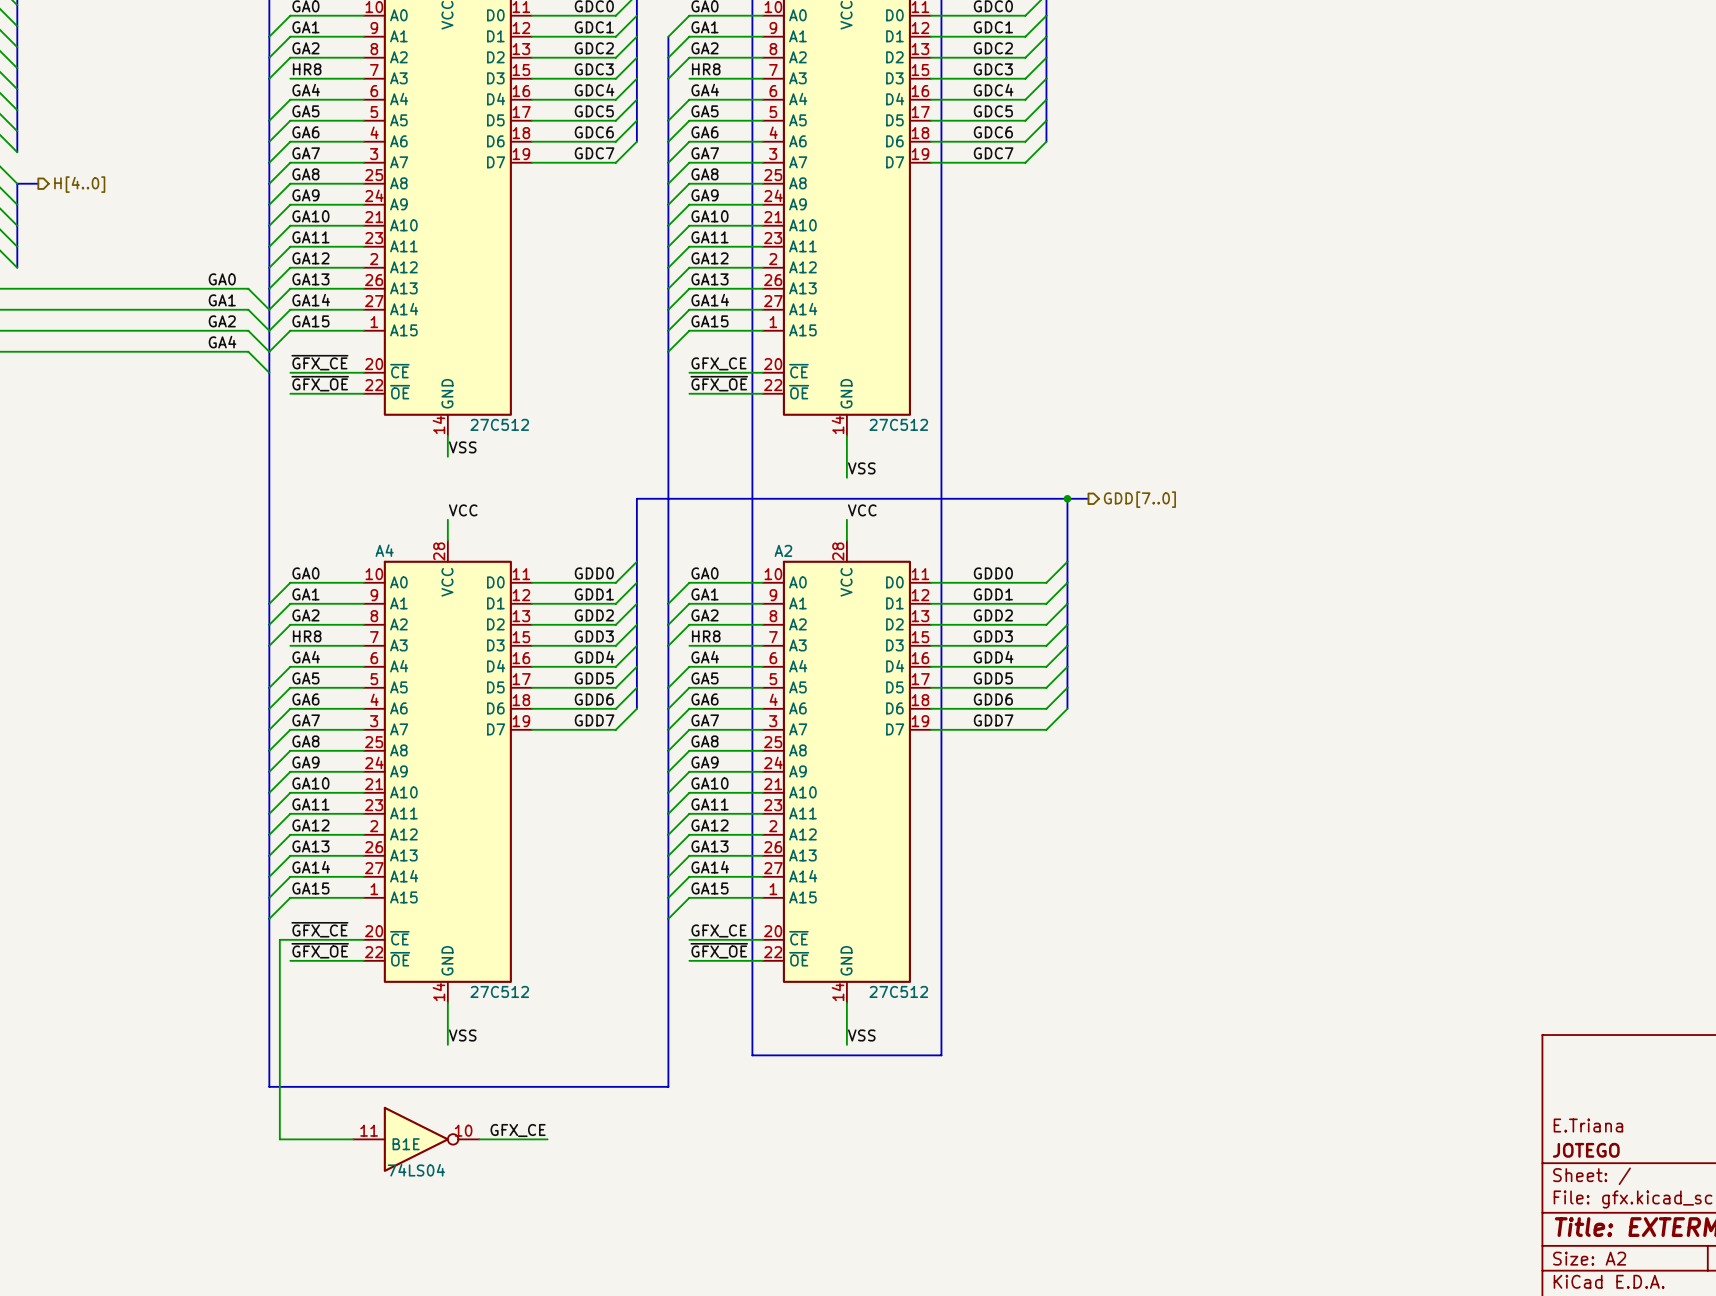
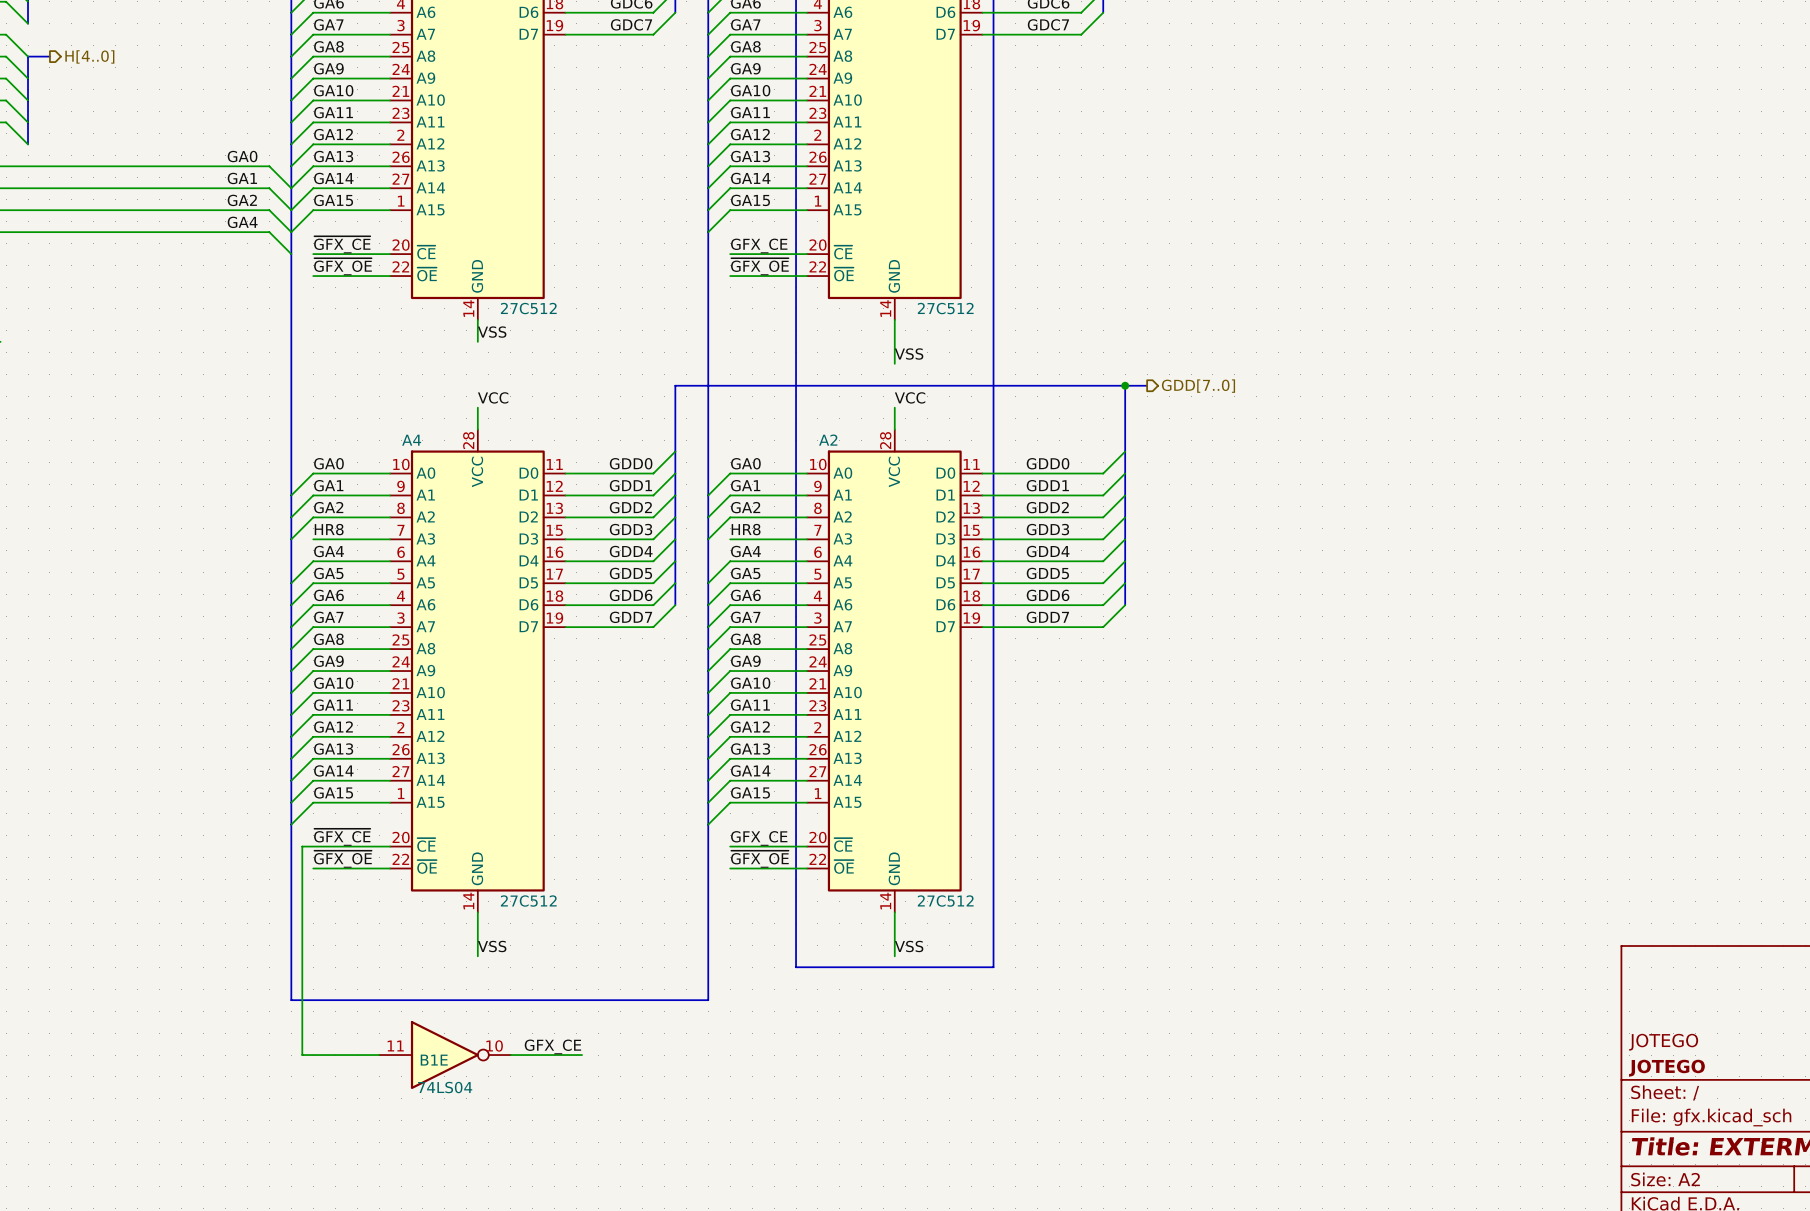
title block: E.Triana (1588, 1125) -> JOTEGO (1663, 1042)

